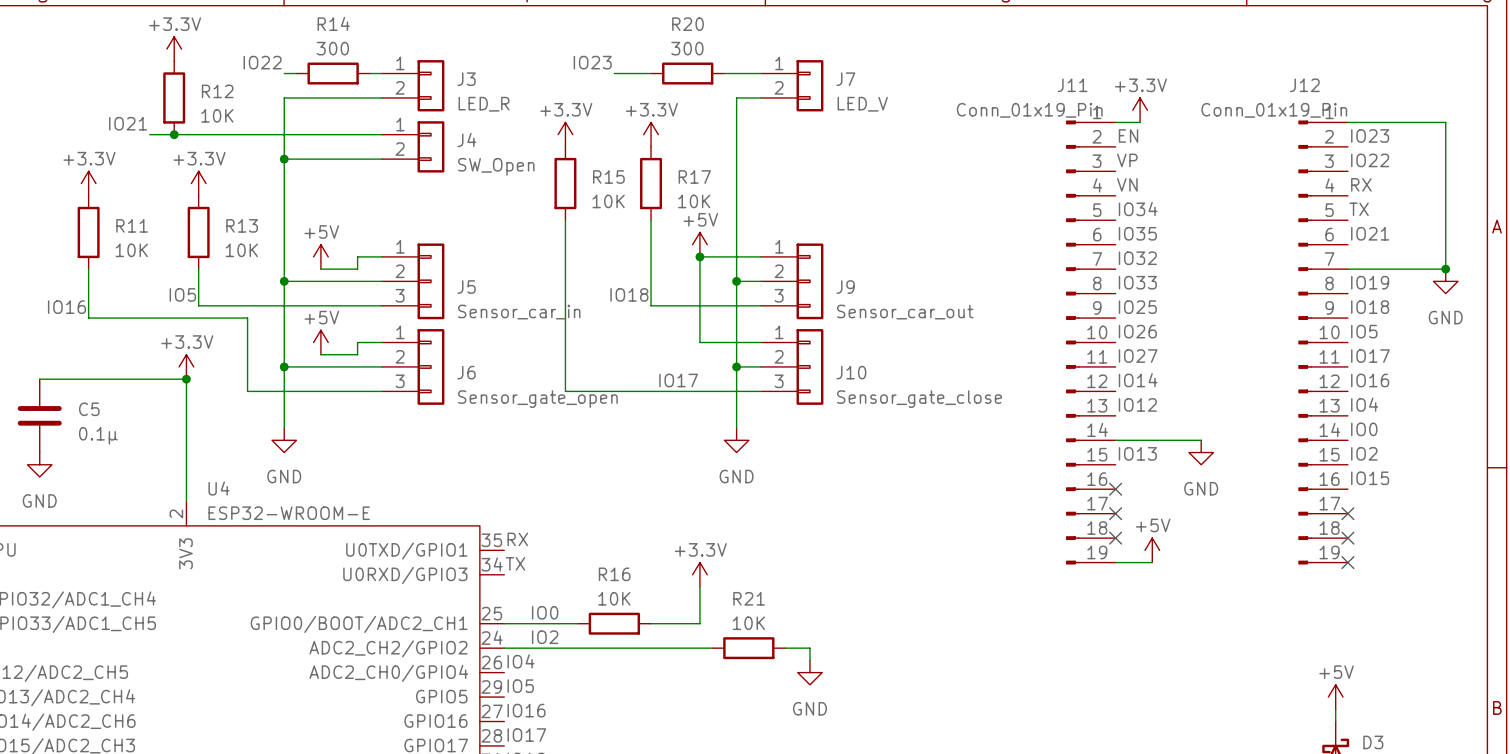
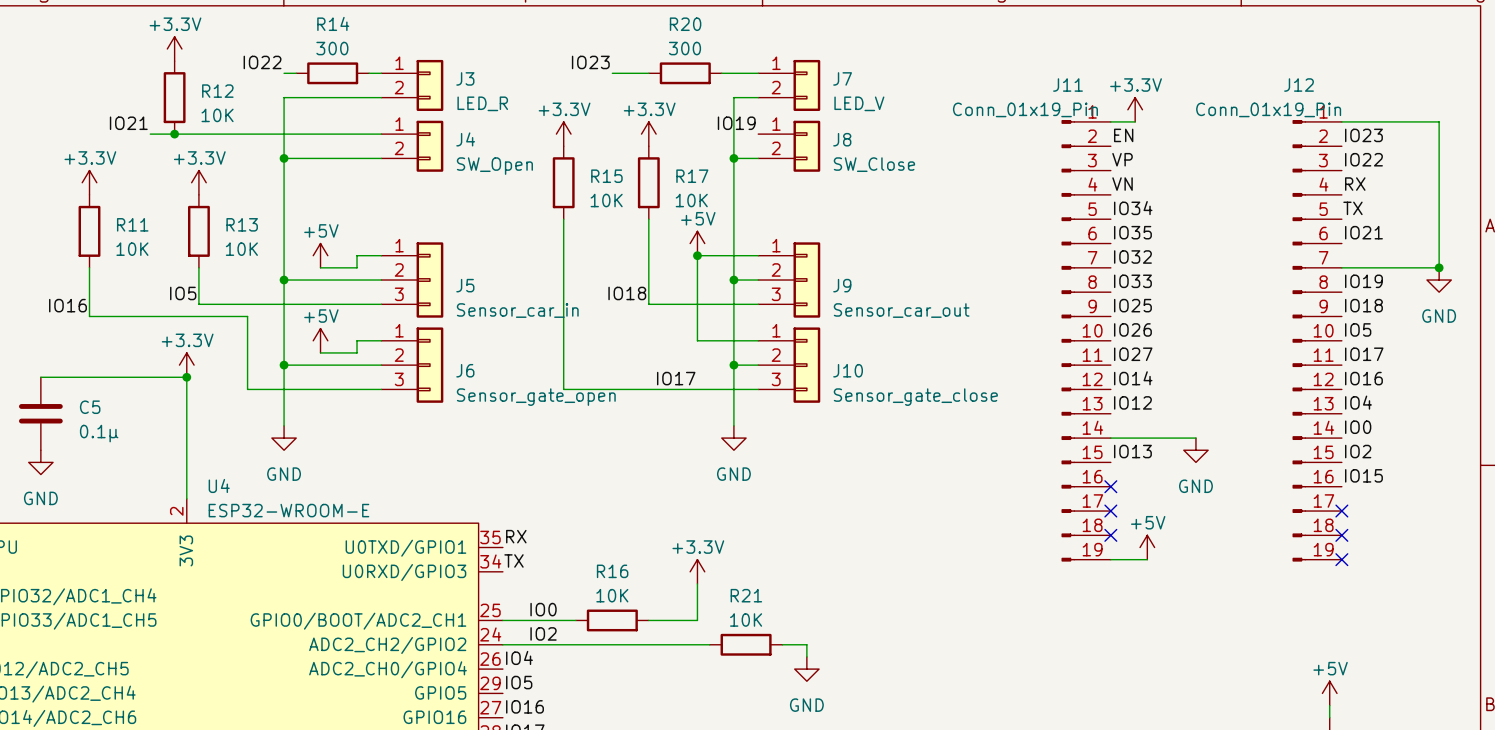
label: none -> IO19 (736, 123)
J8: none -> SW_Close (789, 146)
wire: none -> (733, 158) (758, 158)
junction: none -> (733, 158)

